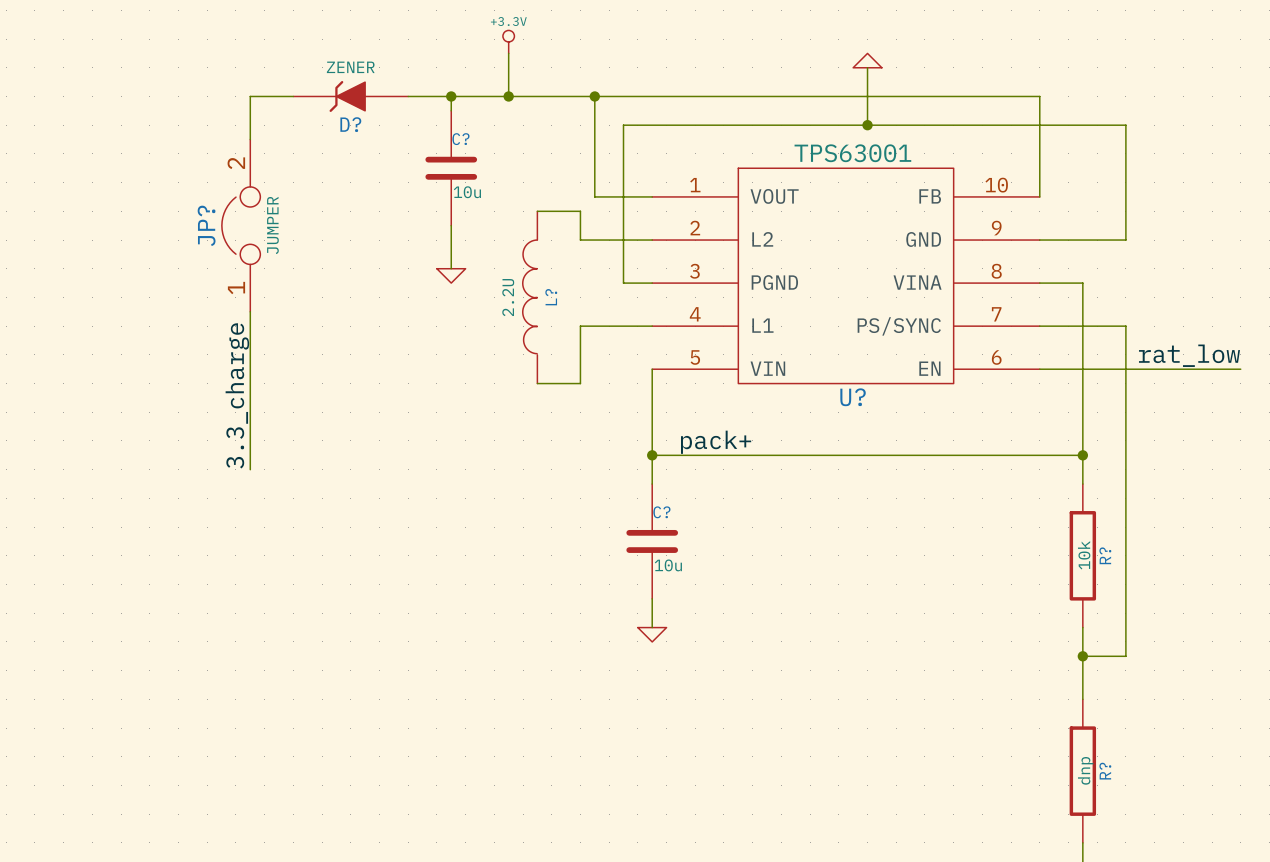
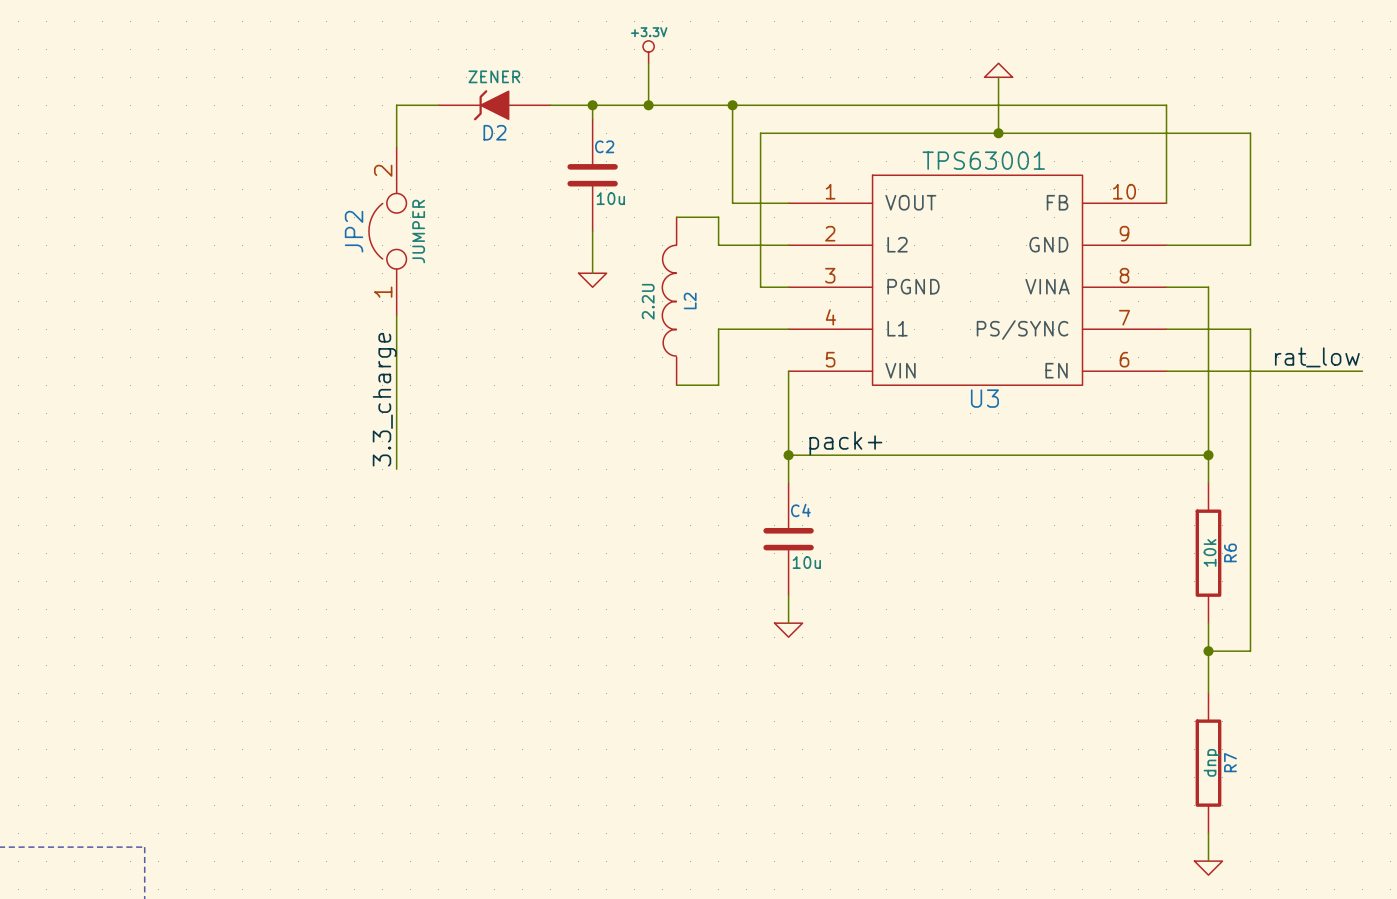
D? name: D? (350, 124) -> D2 (494, 132)
C? name: C? (460, 139) -> C2 (604, 146)
JP? name: JP? (206, 225) -> JP2 (354, 231)
L? name: L? (551, 297) -> L2 (690, 300)
U? name: U? (853, 397) -> U3 (984, 398)
C? name: C? (661, 512) -> C4 (800, 510)
R? name: R? (1105, 555) -> R6 (1230, 552)
R? name: R? (1105, 771) -> R7 (1230, 762)

